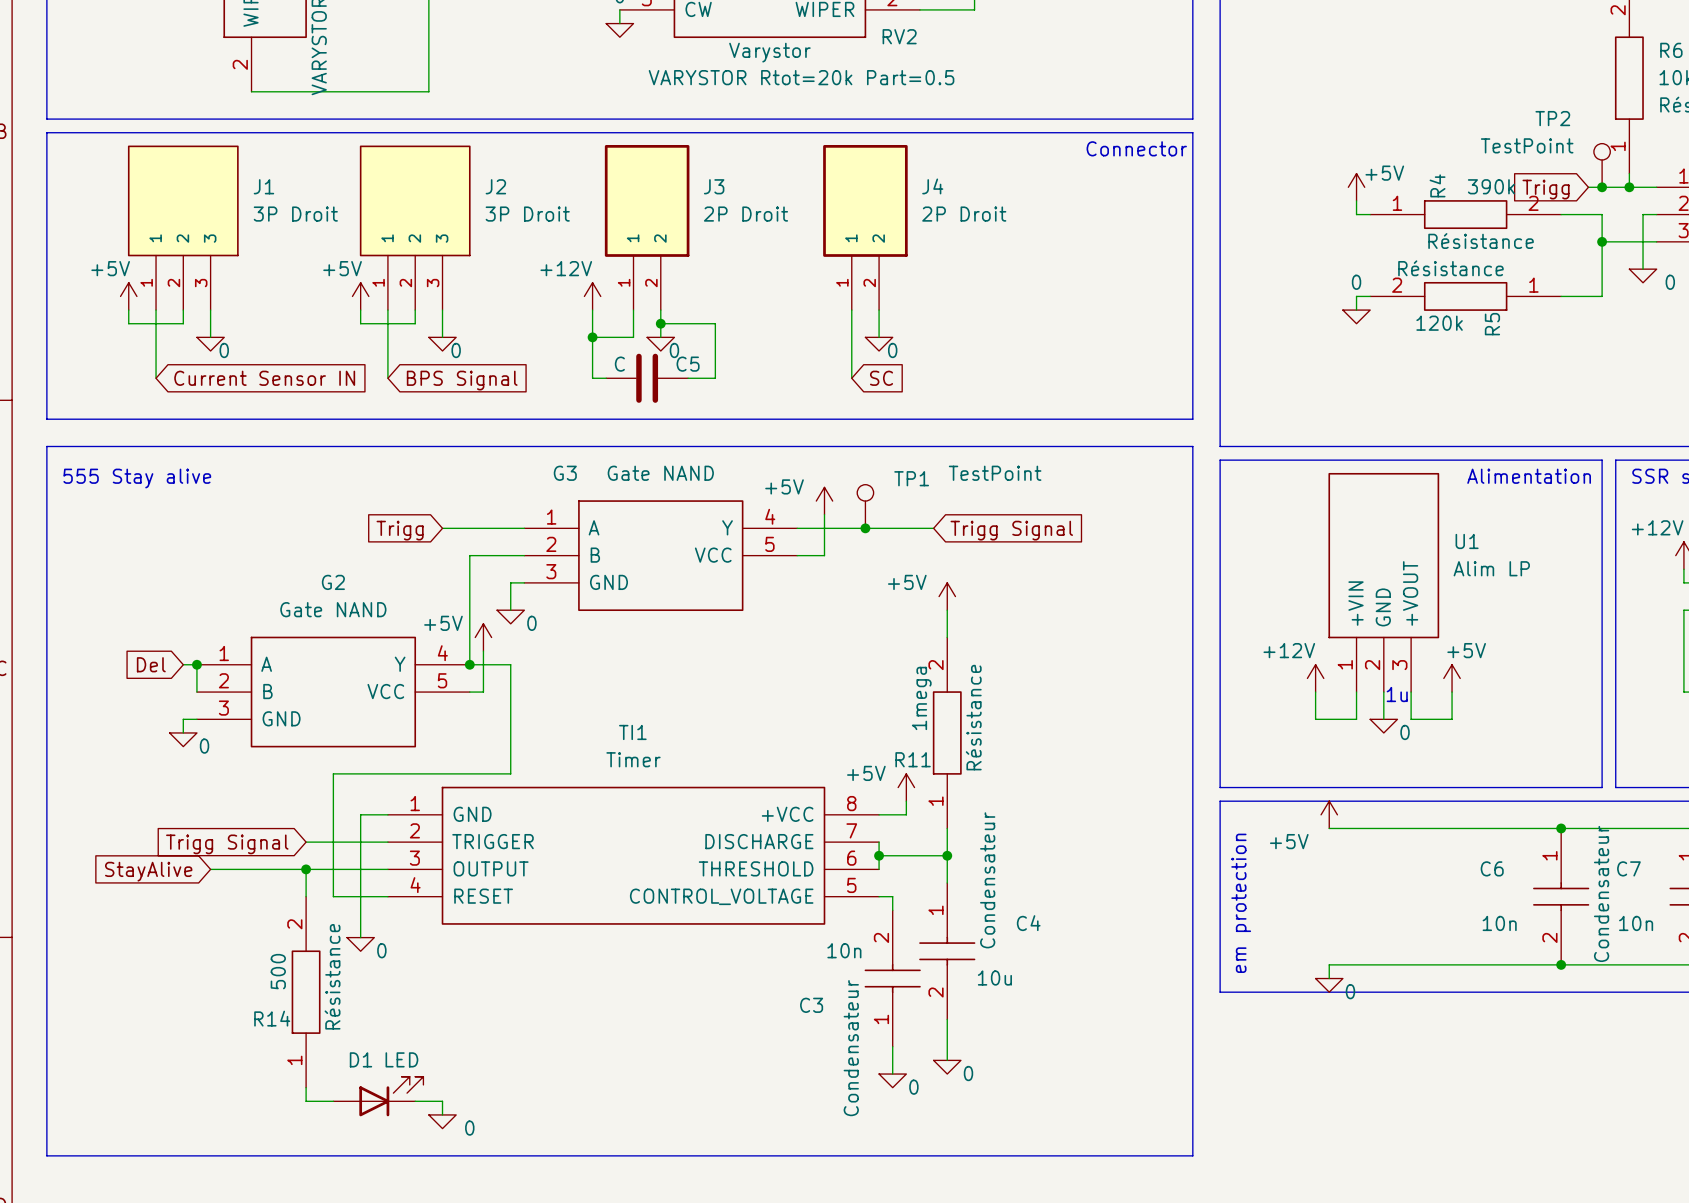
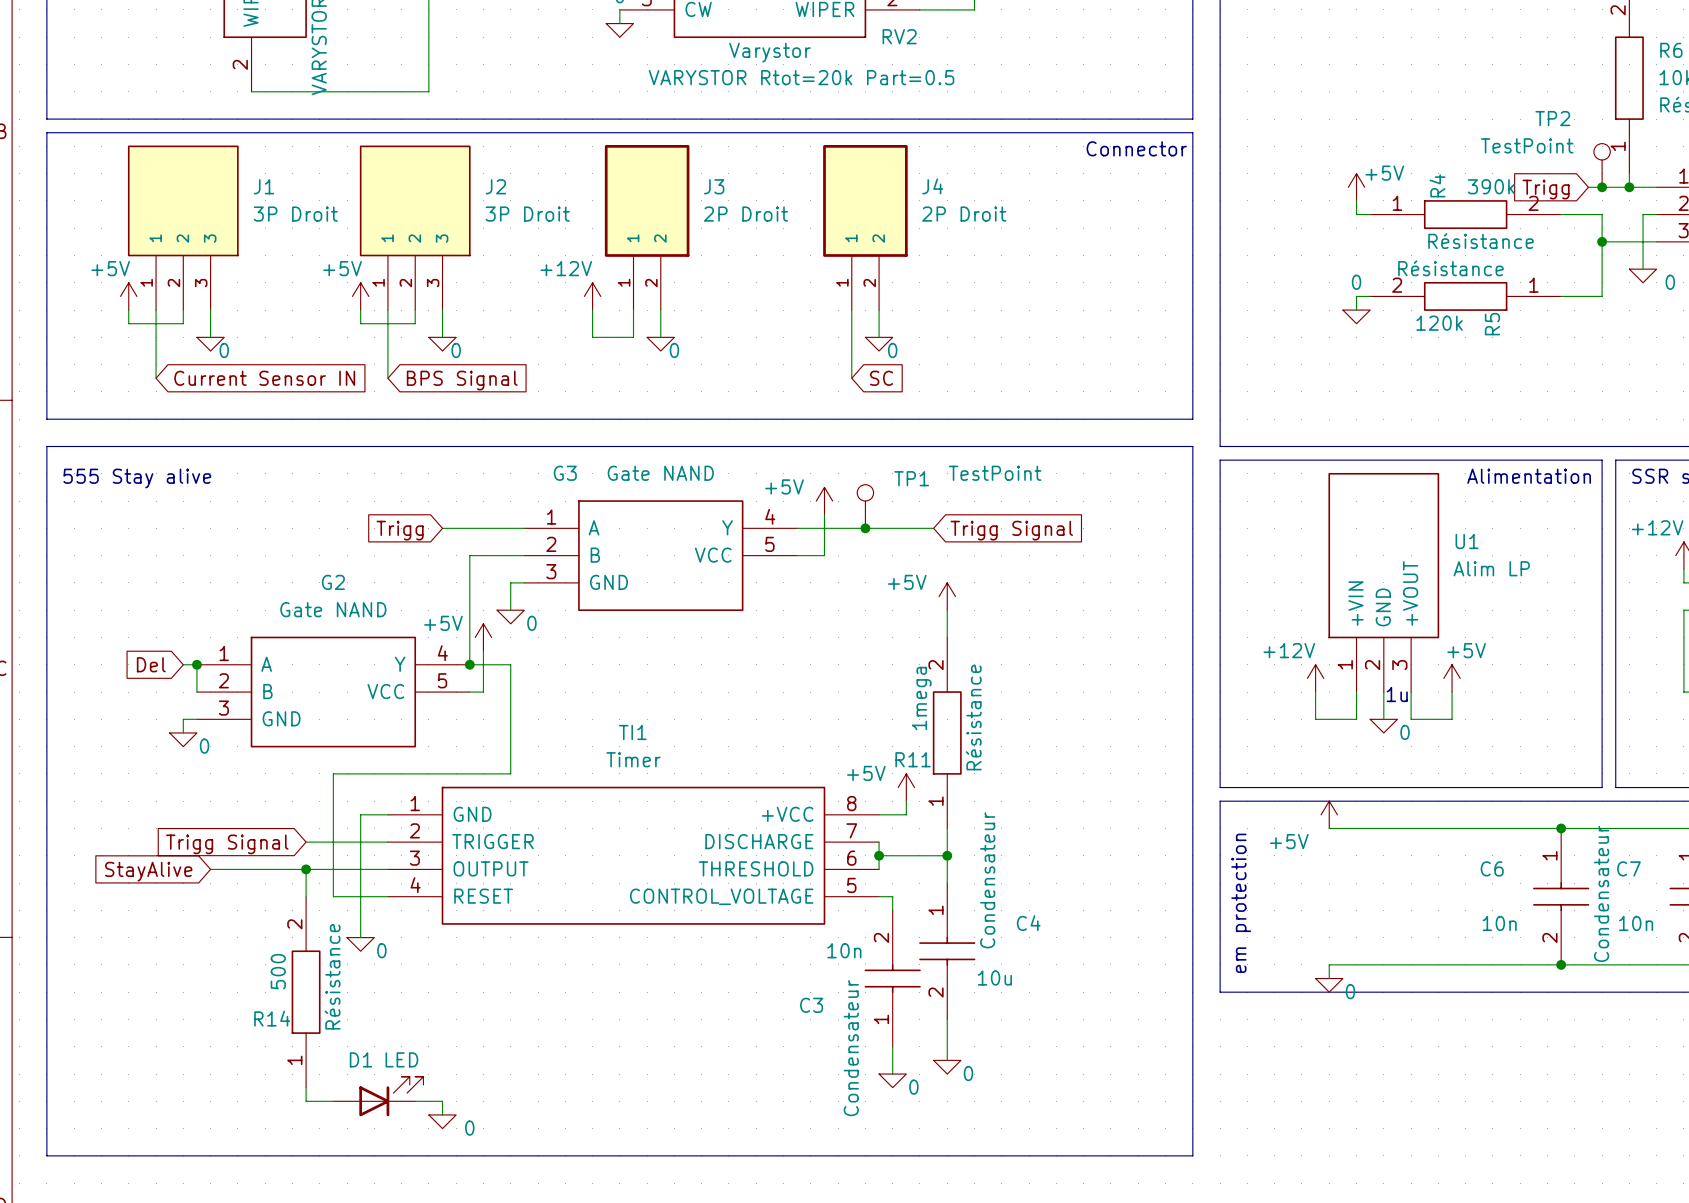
wire: (660, 323) (715, 323) (715, 378) (688, 378) -> none
junction: (660, 323) -> none
wire: (592, 337) (592, 378) (606, 378) -> none
junction: (592, 337) -> none
C5: C (647, 378) -> none

